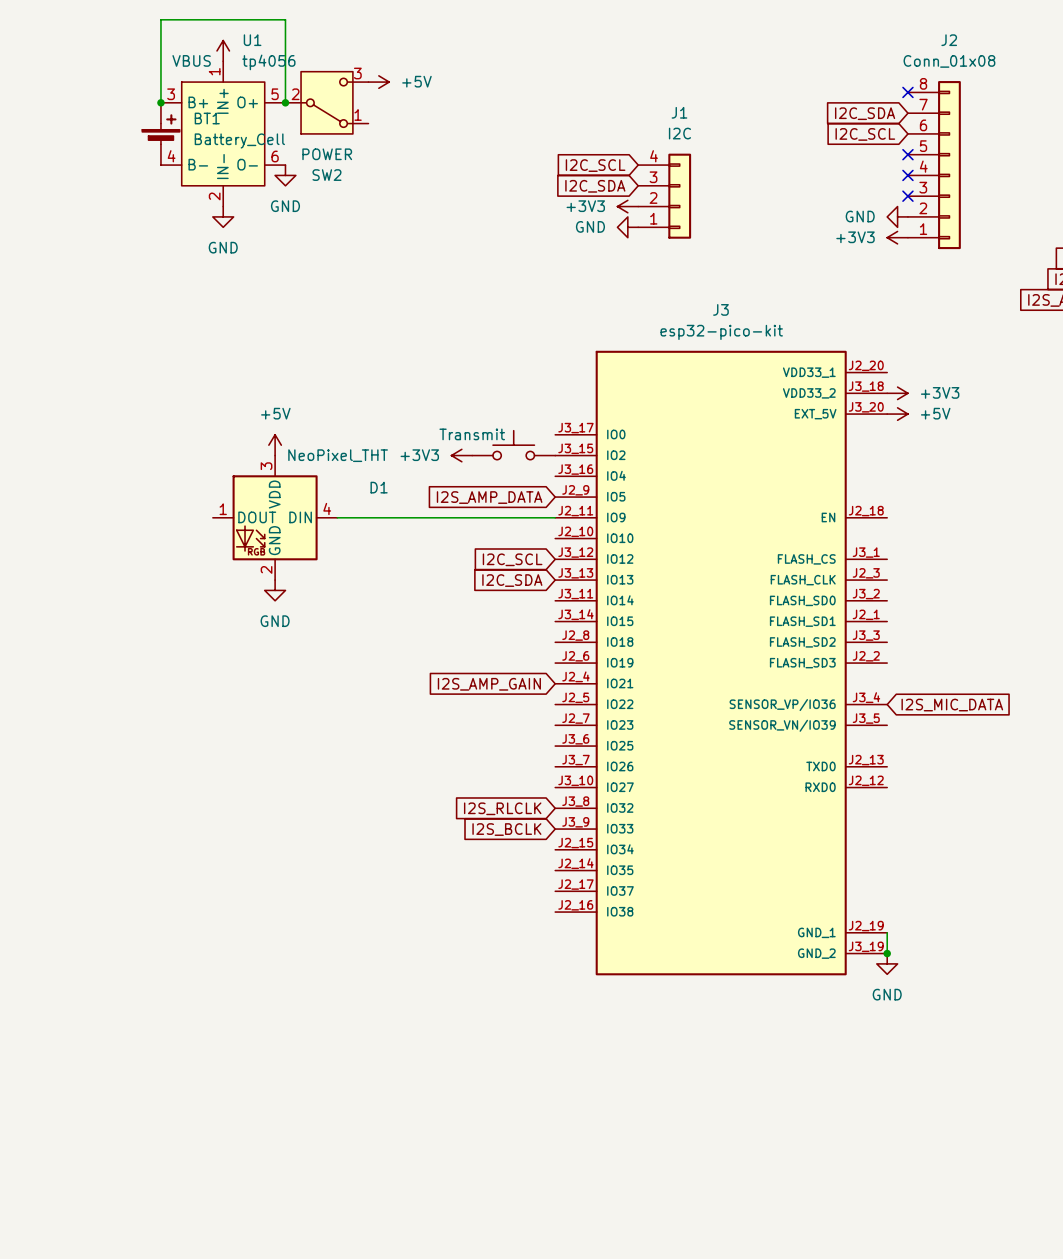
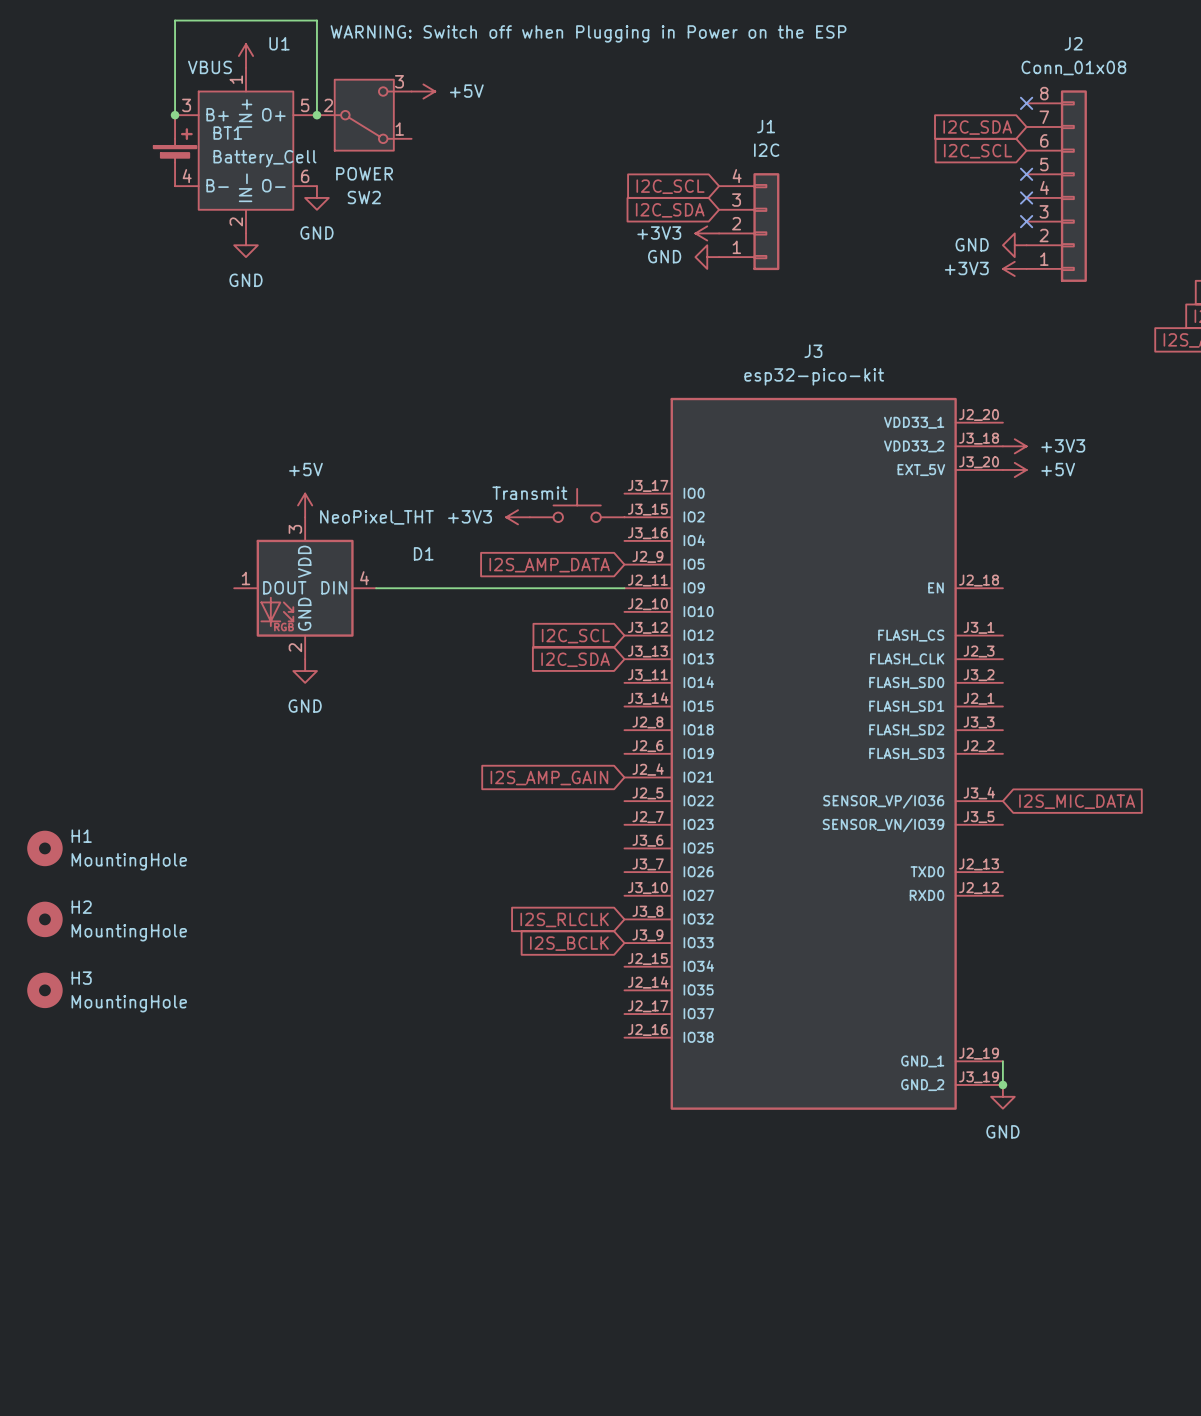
U1 value: tp4056 (268, 62) -> WARNING: Switch off when Plugging in Power on the ESP (588, 33)
H1: none -> MountingHole (44, 848)
H2: none -> MountingHole (44, 919)
H3: none -> MountingHole (44, 990)

